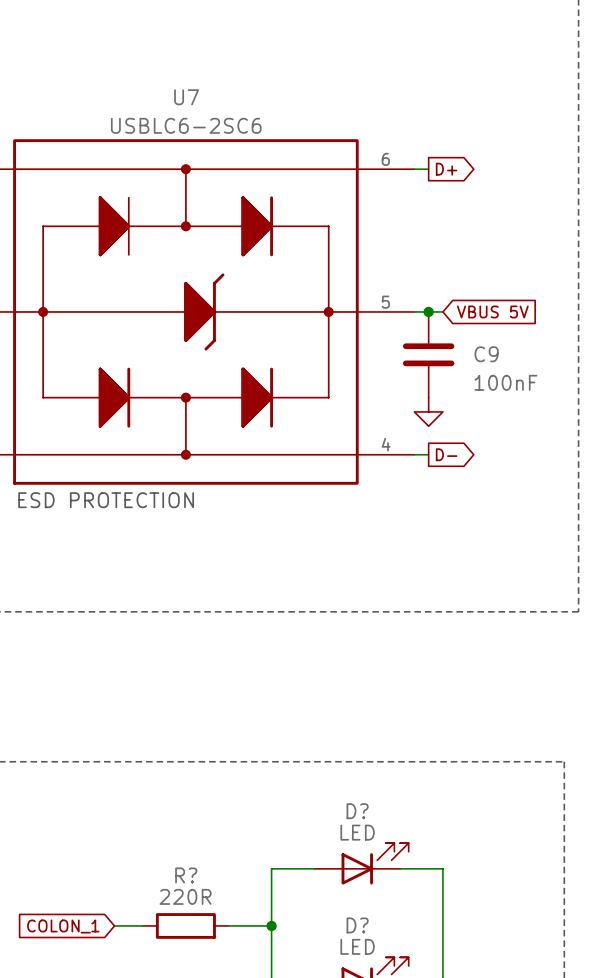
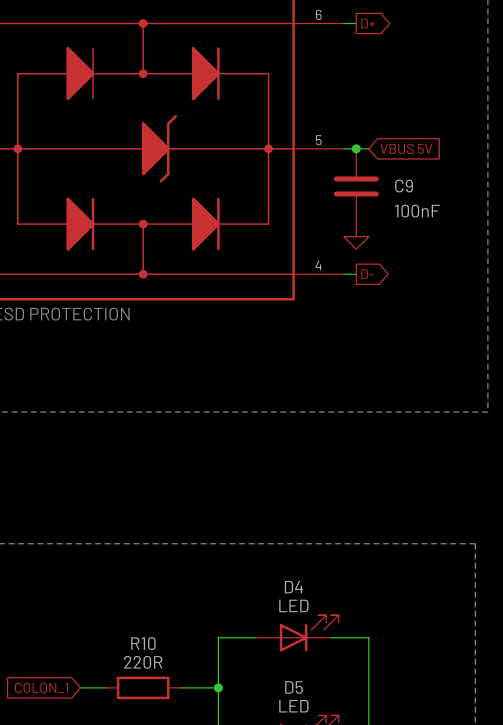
D? name: D? (357, 811) -> D4 (293, 587)
R? name: R? (186, 875) -> R10 (143, 643)
D? name: D? (357, 925) -> D5 (294, 687)

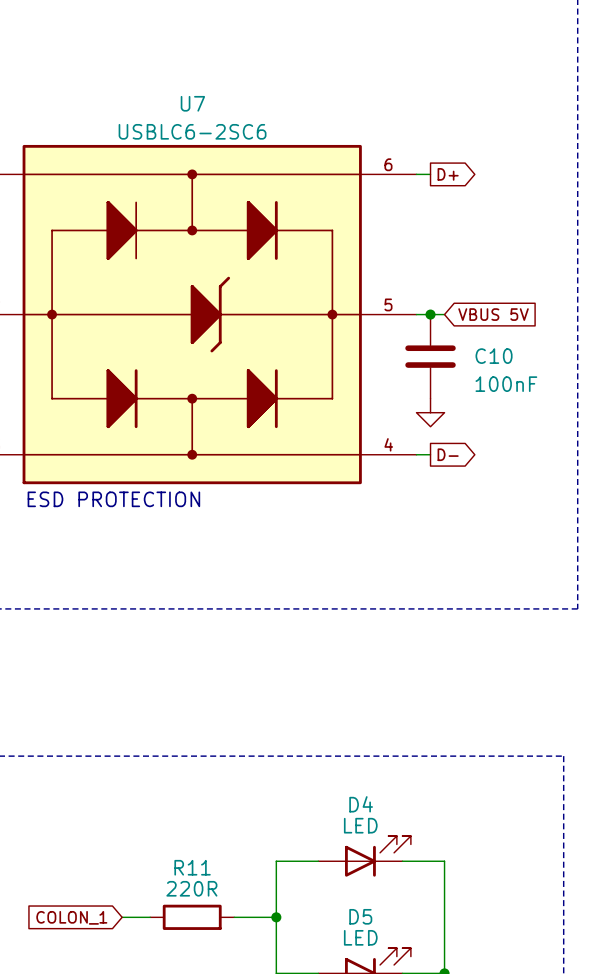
C9 name: C9 (404, 186) -> C10 (494, 356)
R10 name: R10 (143, 643) -> R11 (192, 867)

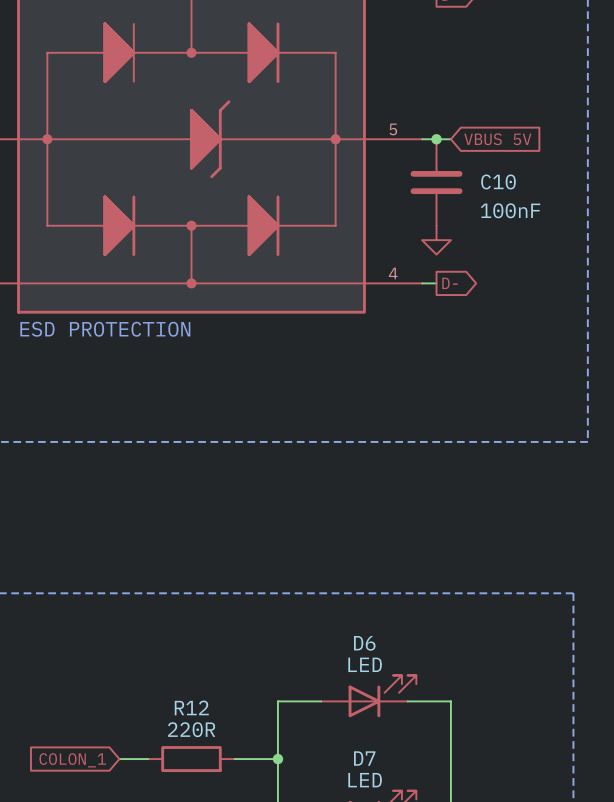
D4 name: D4 (361, 804) -> D6 (364, 643)
R11 name: R11 (192, 867) -> R12 (191, 707)
D5 name: D5 (360, 916) -> D7 (364, 758)

